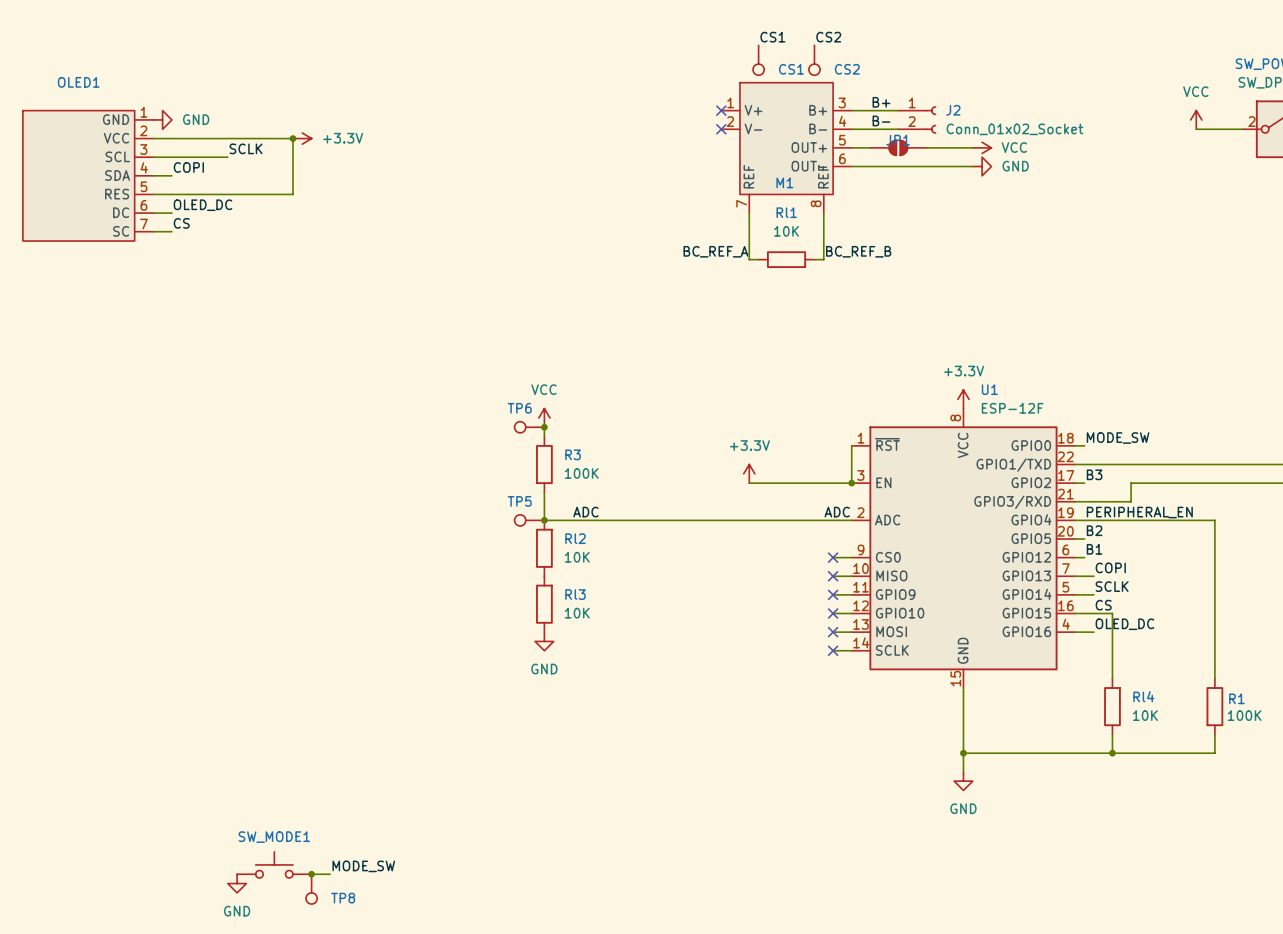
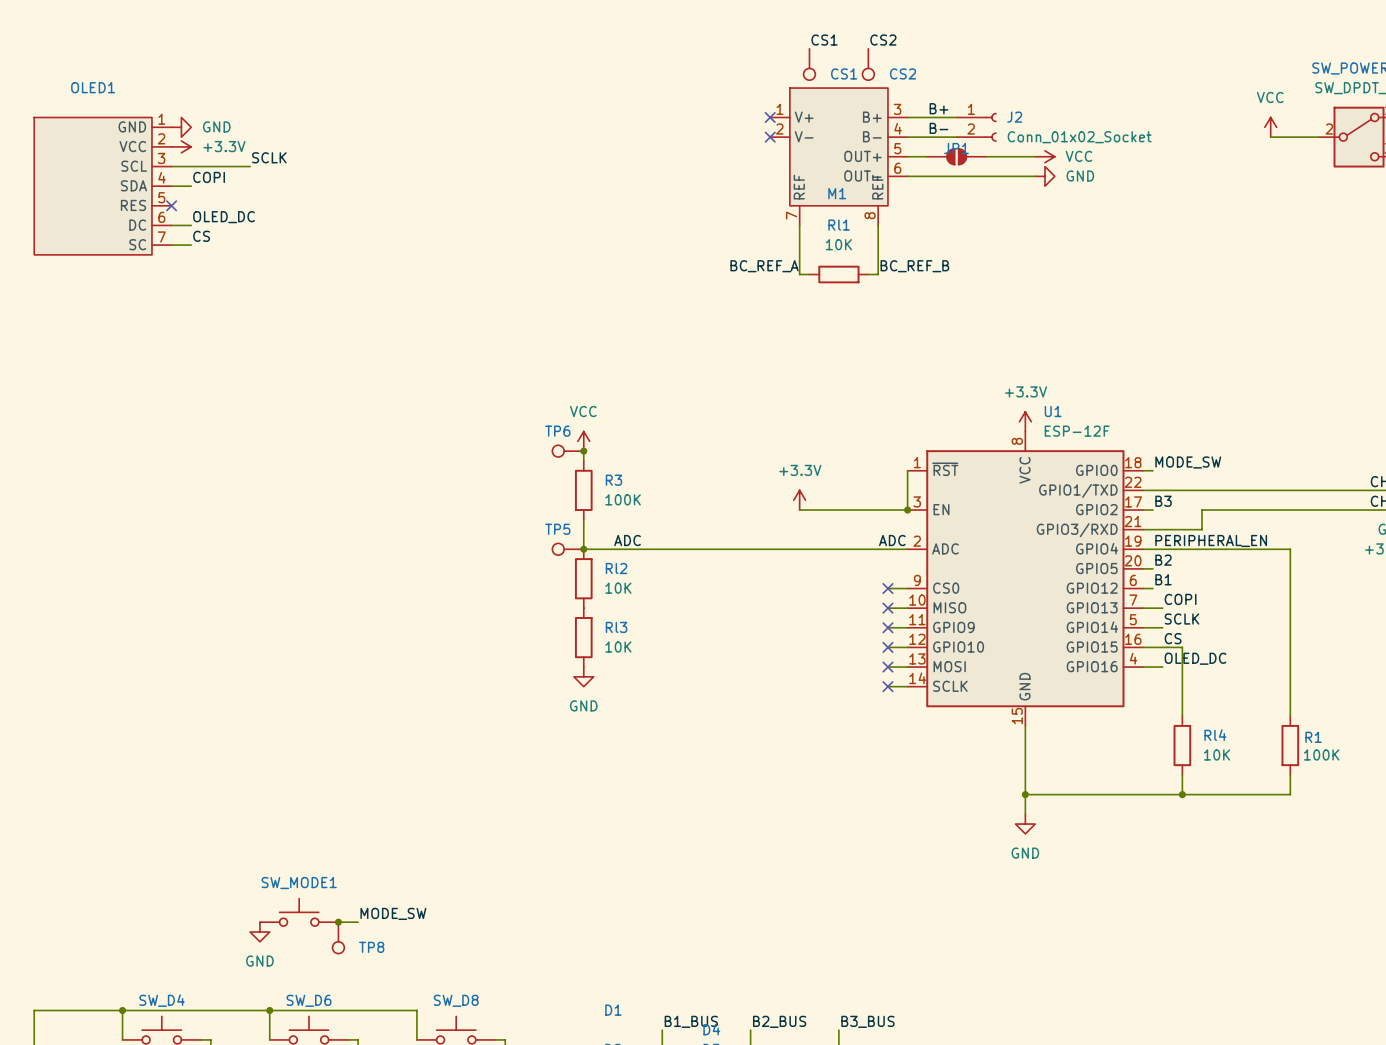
wire: (153, 138) (292, 138) (292, 194) (153, 194) -> none
junction: (292, 138) -> none
power symbol position: +3.3V (302, 138) -> +3.3V (181, 146)
no-connect mark: none -> (171, 205)

